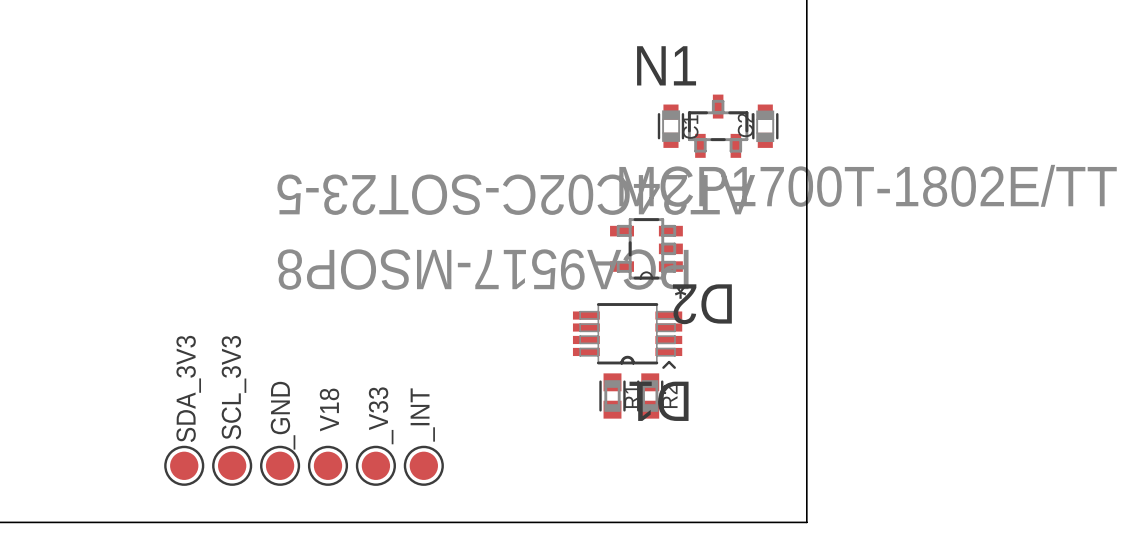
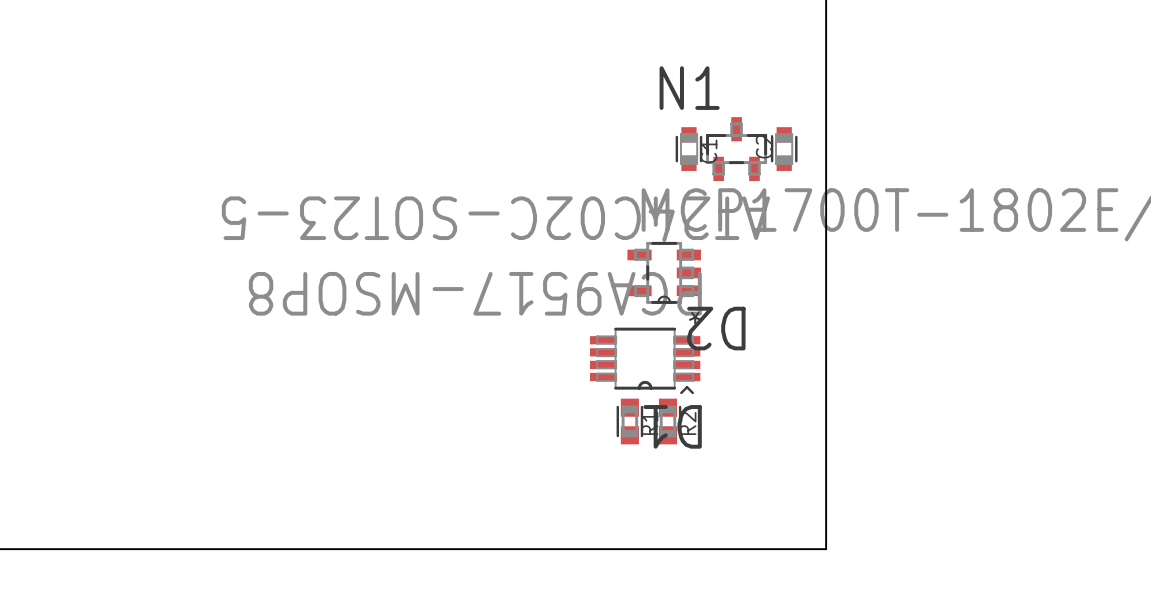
SDA_3V3: (184, 465) -> none
SCL_3V3: (232, 465) -> none
_GND: (280, 465) -> none
V18: (327, 465) -> none
_V33: (375, 465) -> none
_INT: (423, 465) -> none

